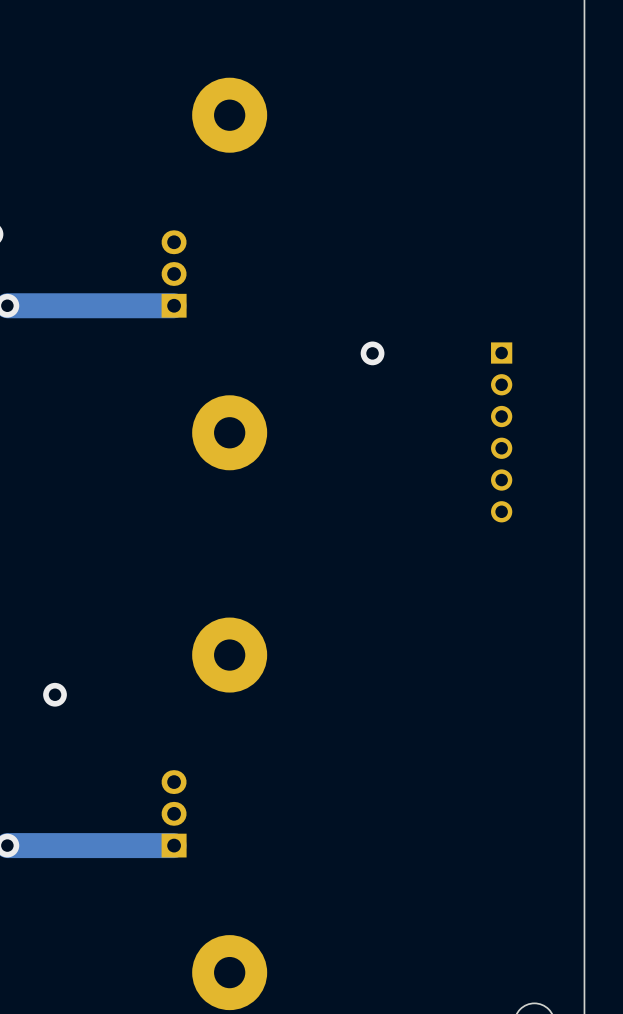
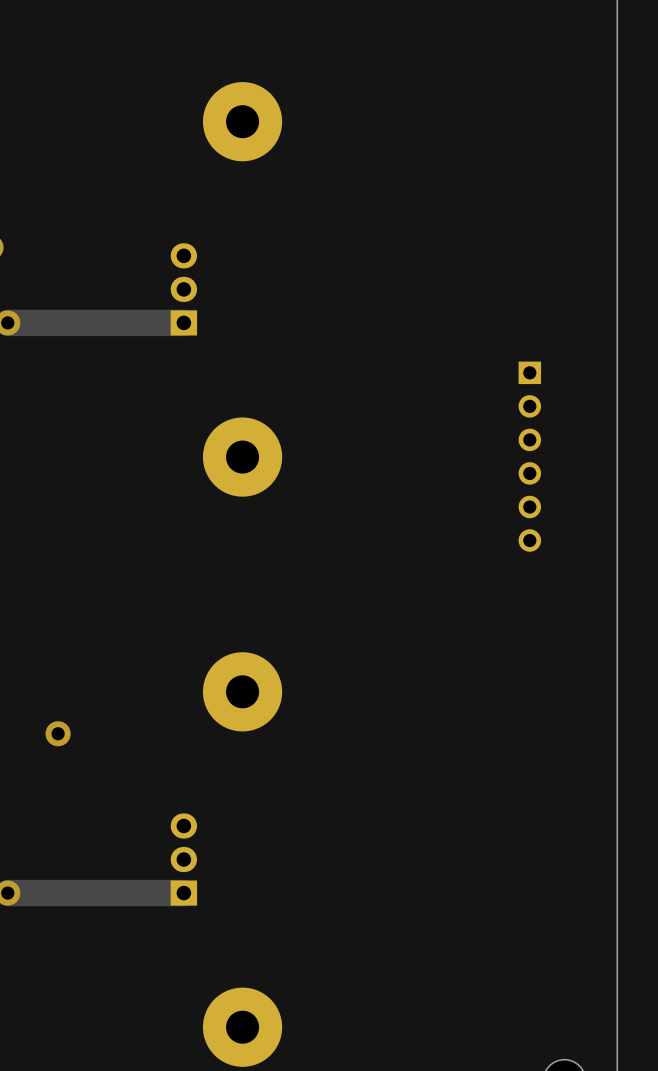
via: (372, 353) -> none

